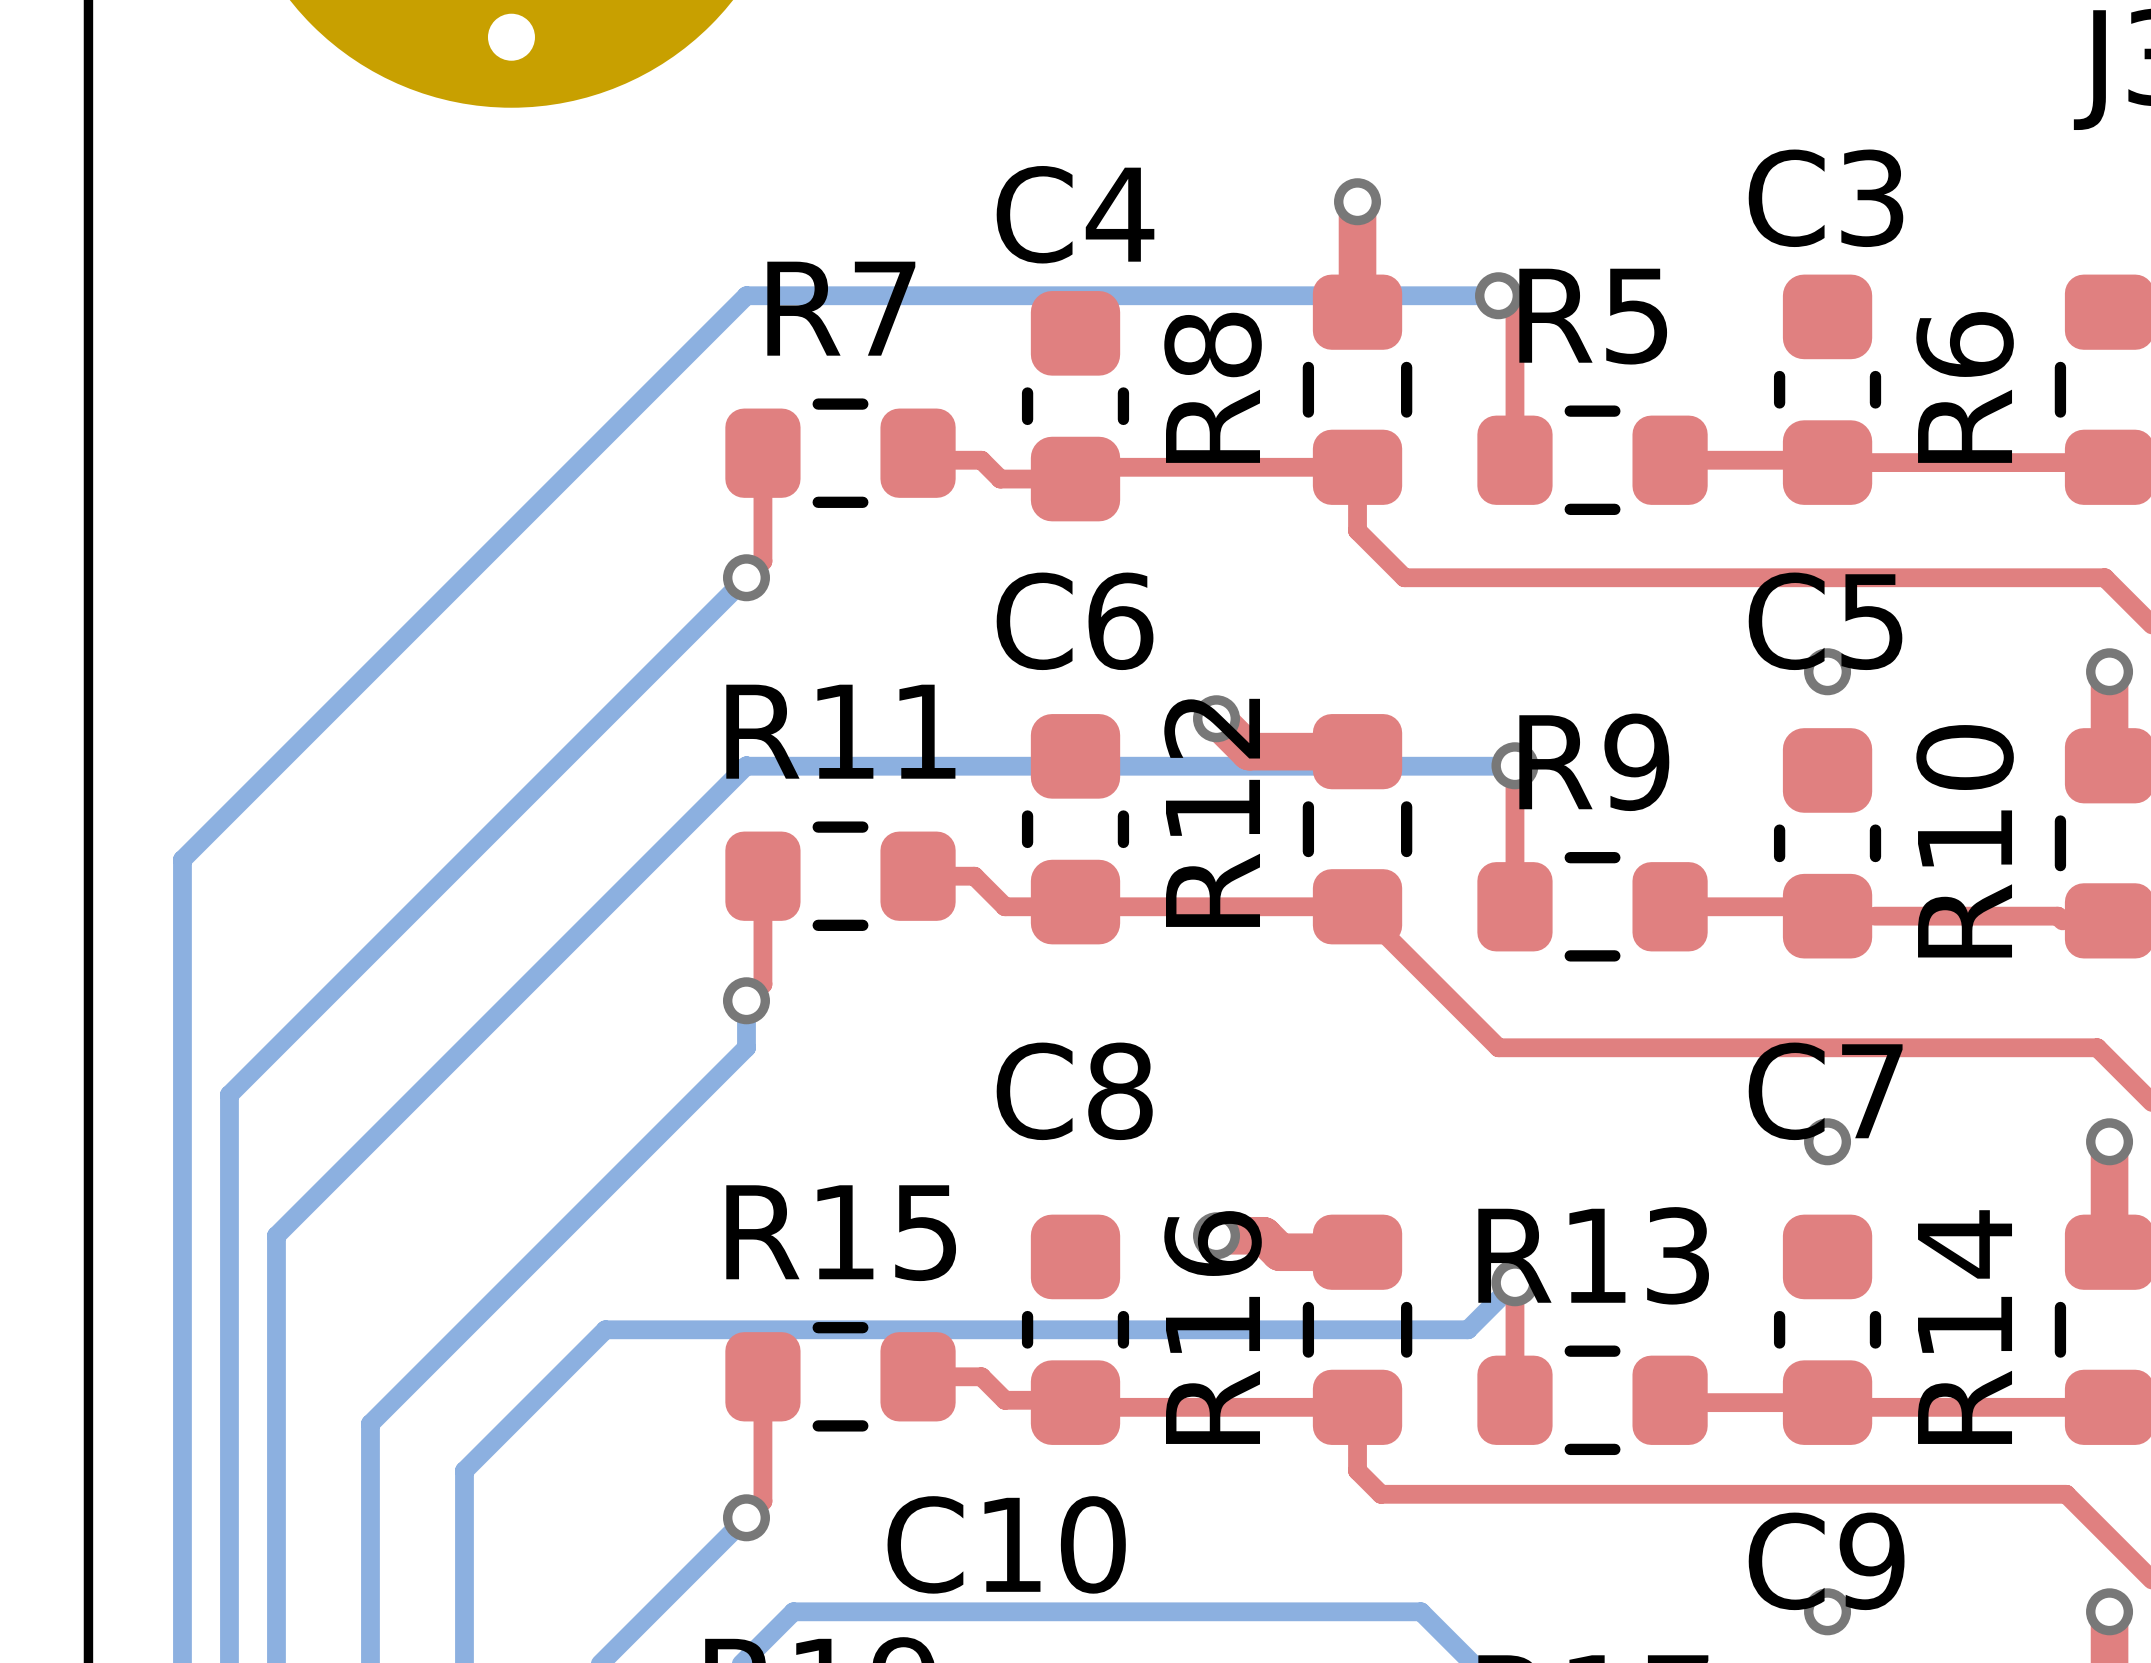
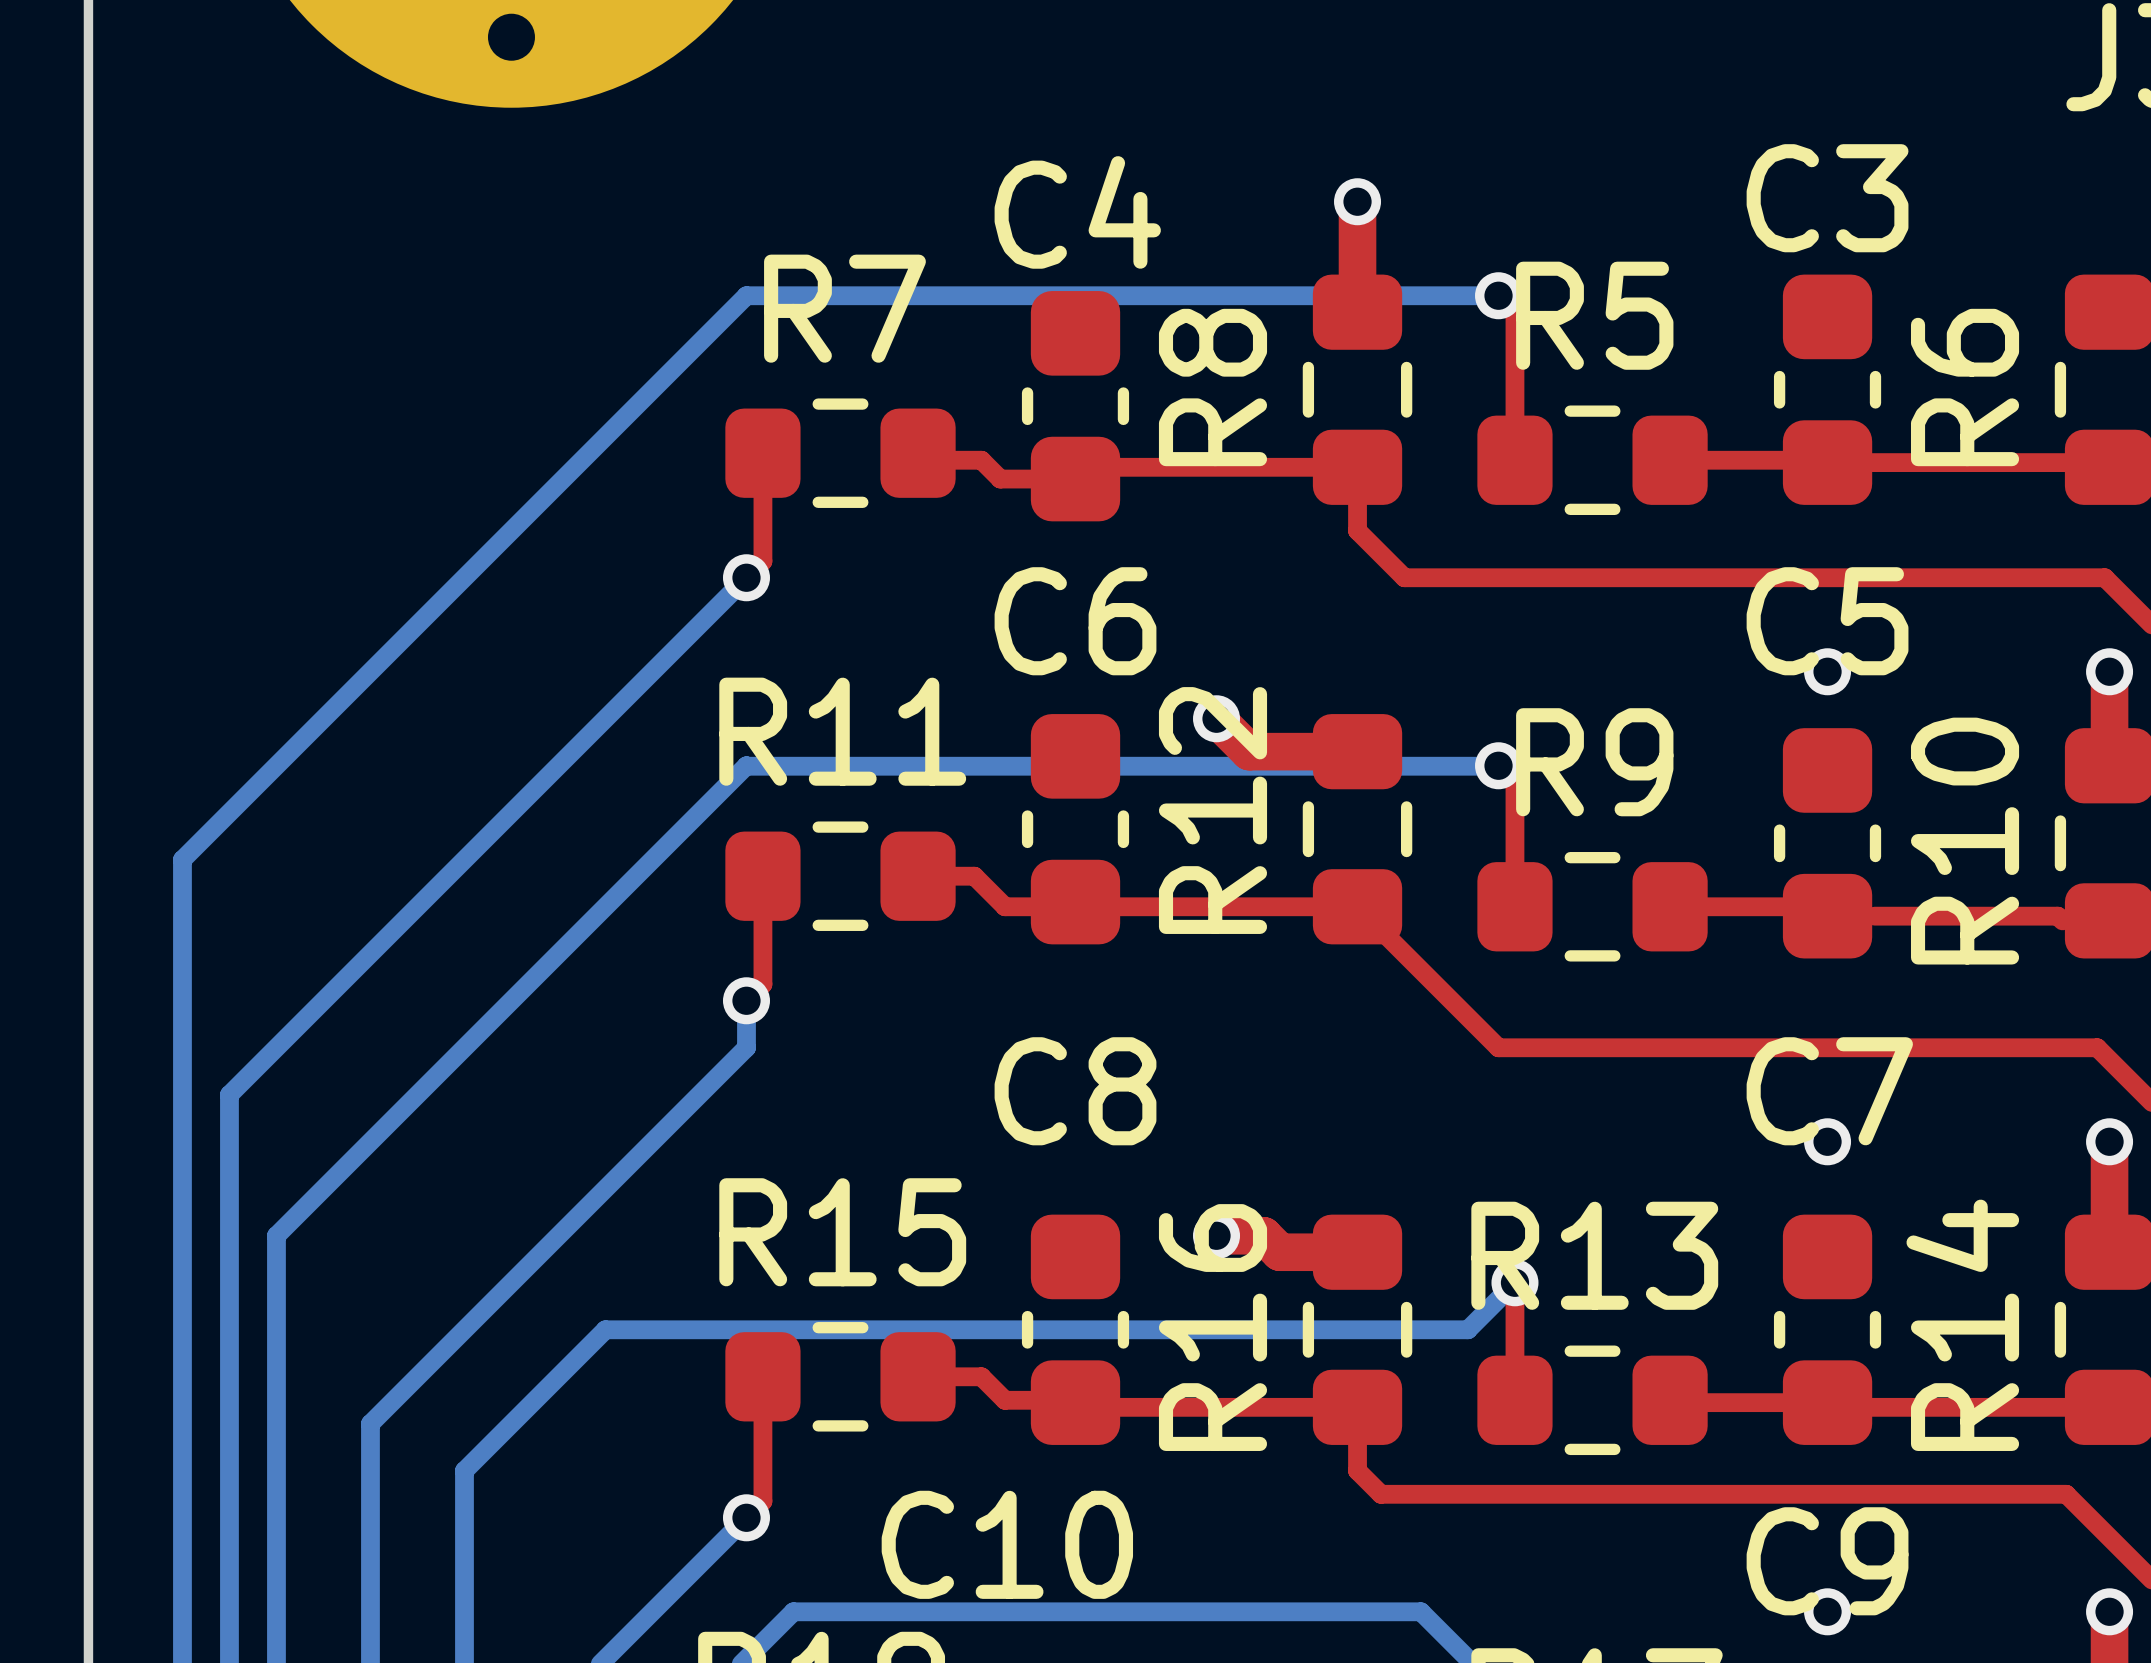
via position: (1514, 765) -> (1498, 765)

